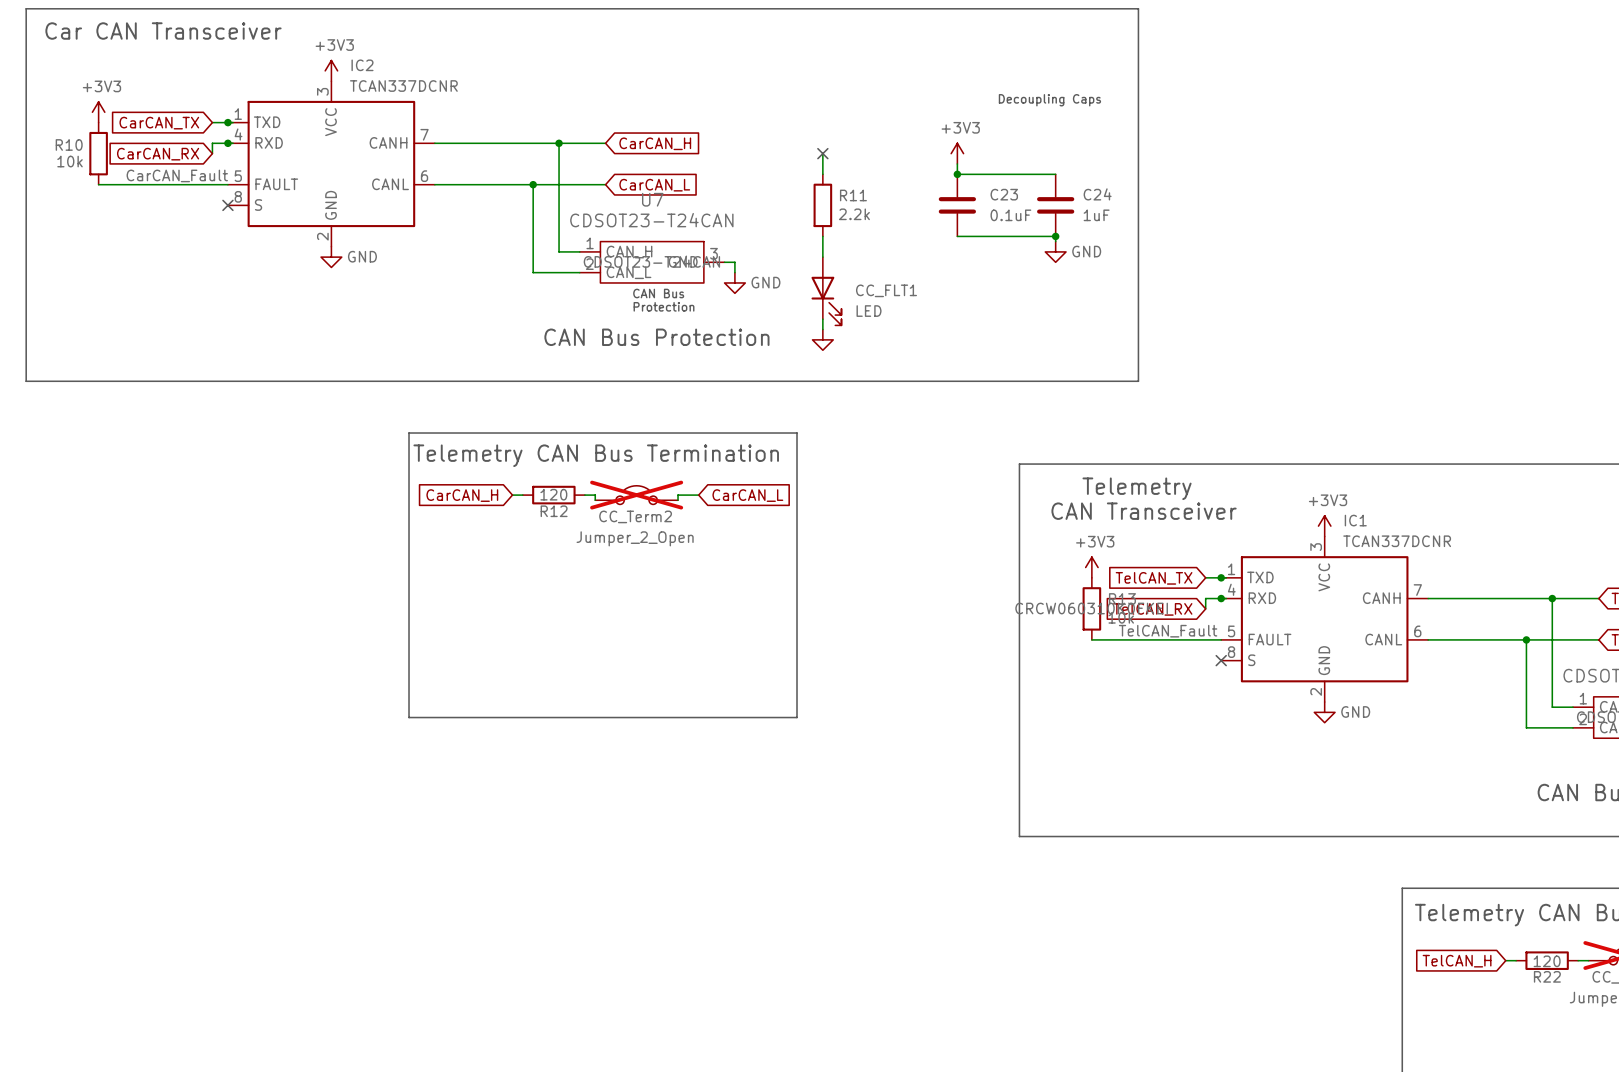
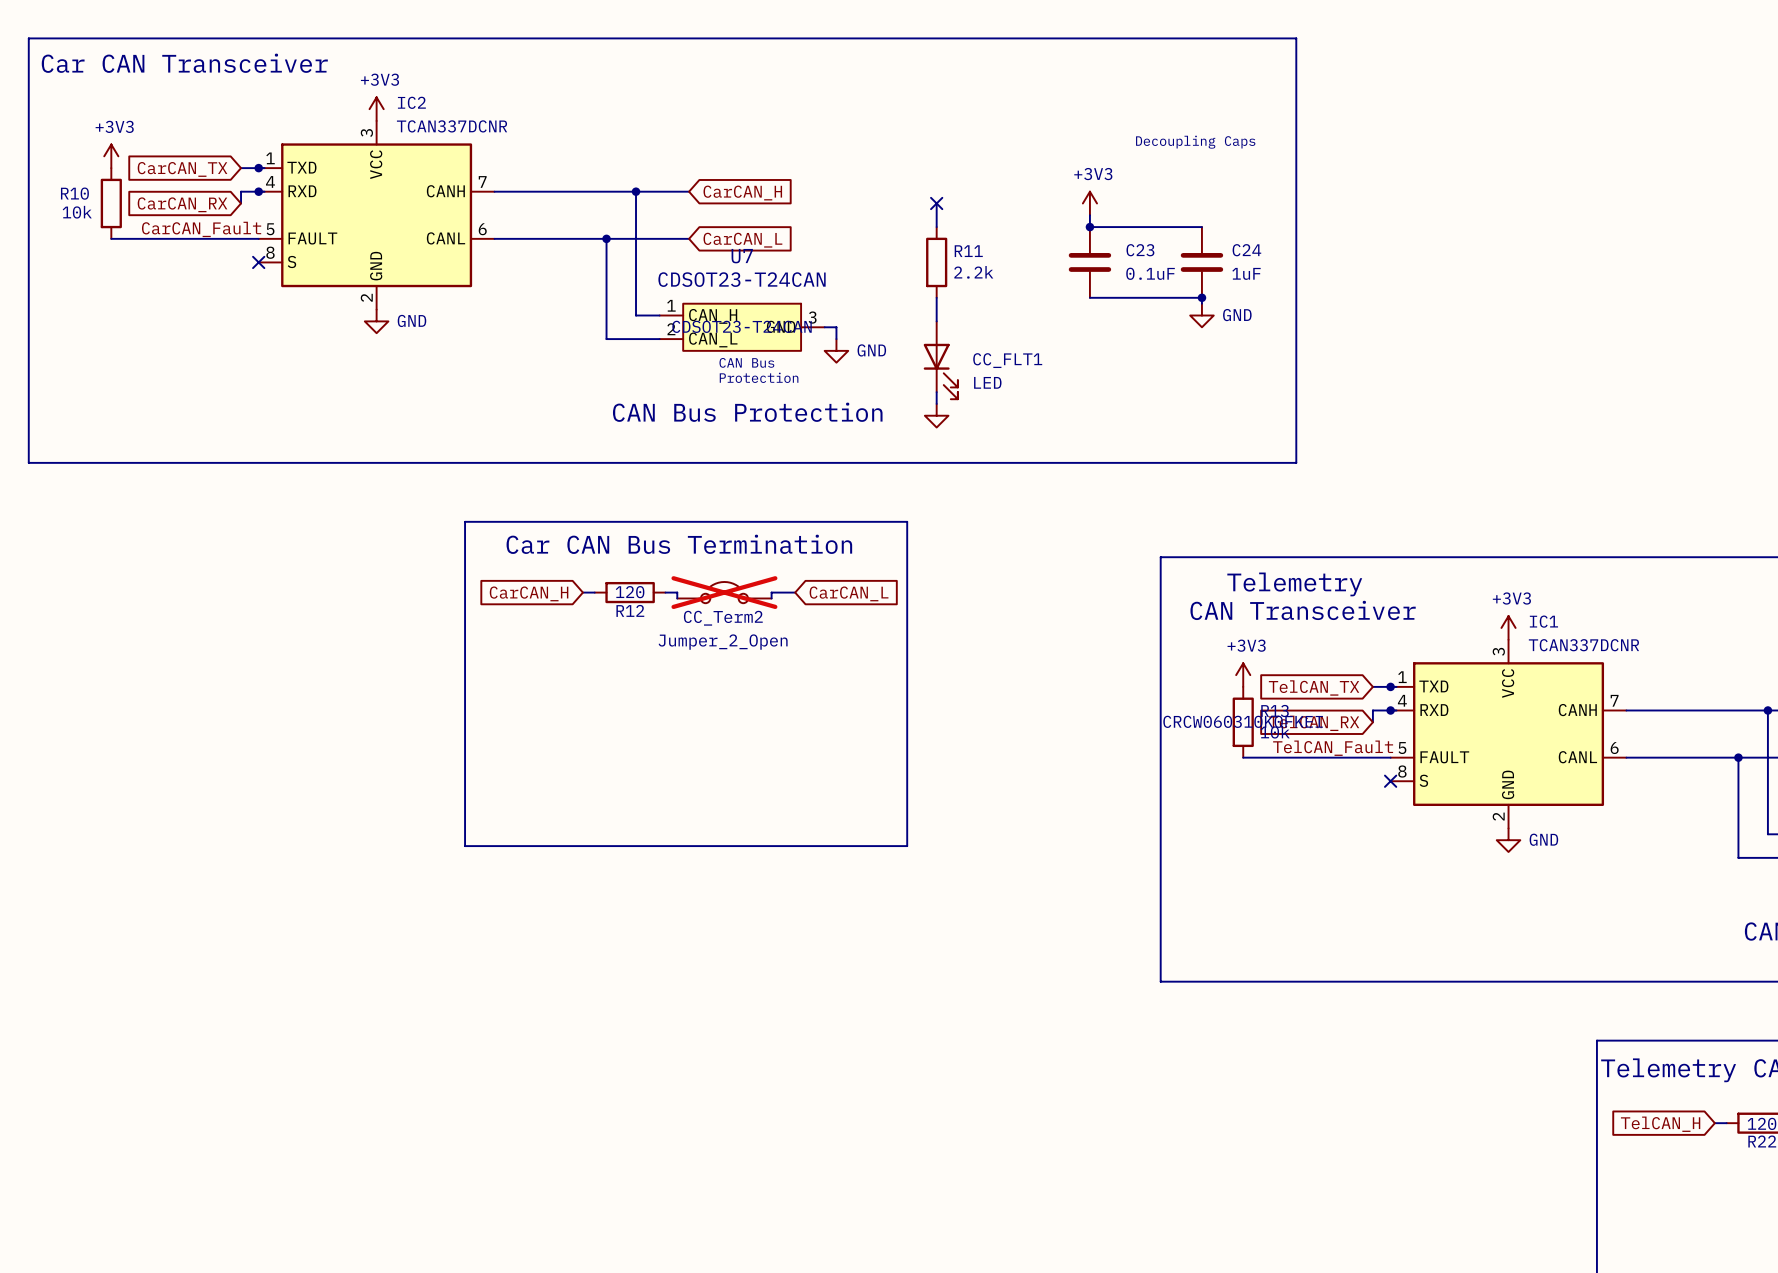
text: Telemetry CAN Bus Termination (596, 455) -> Car CAN Bus Termination (679, 544)

